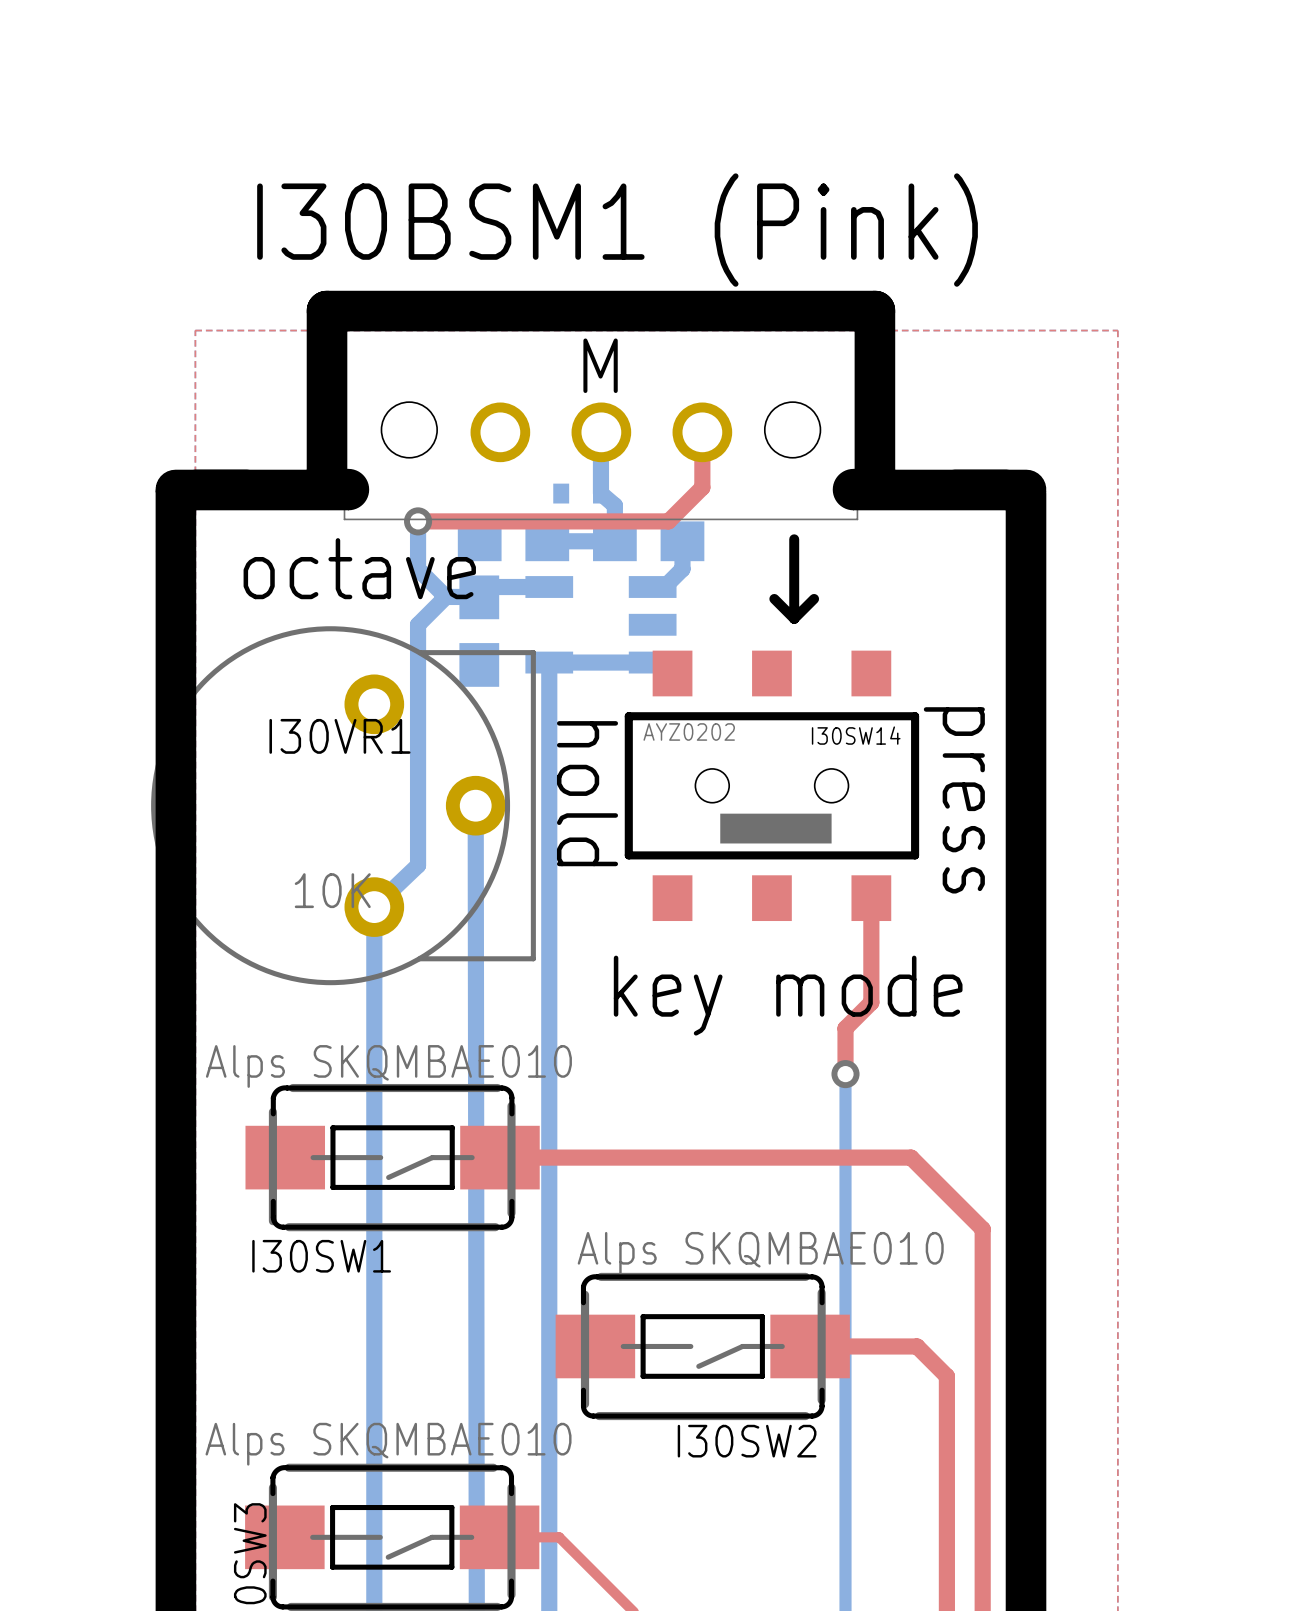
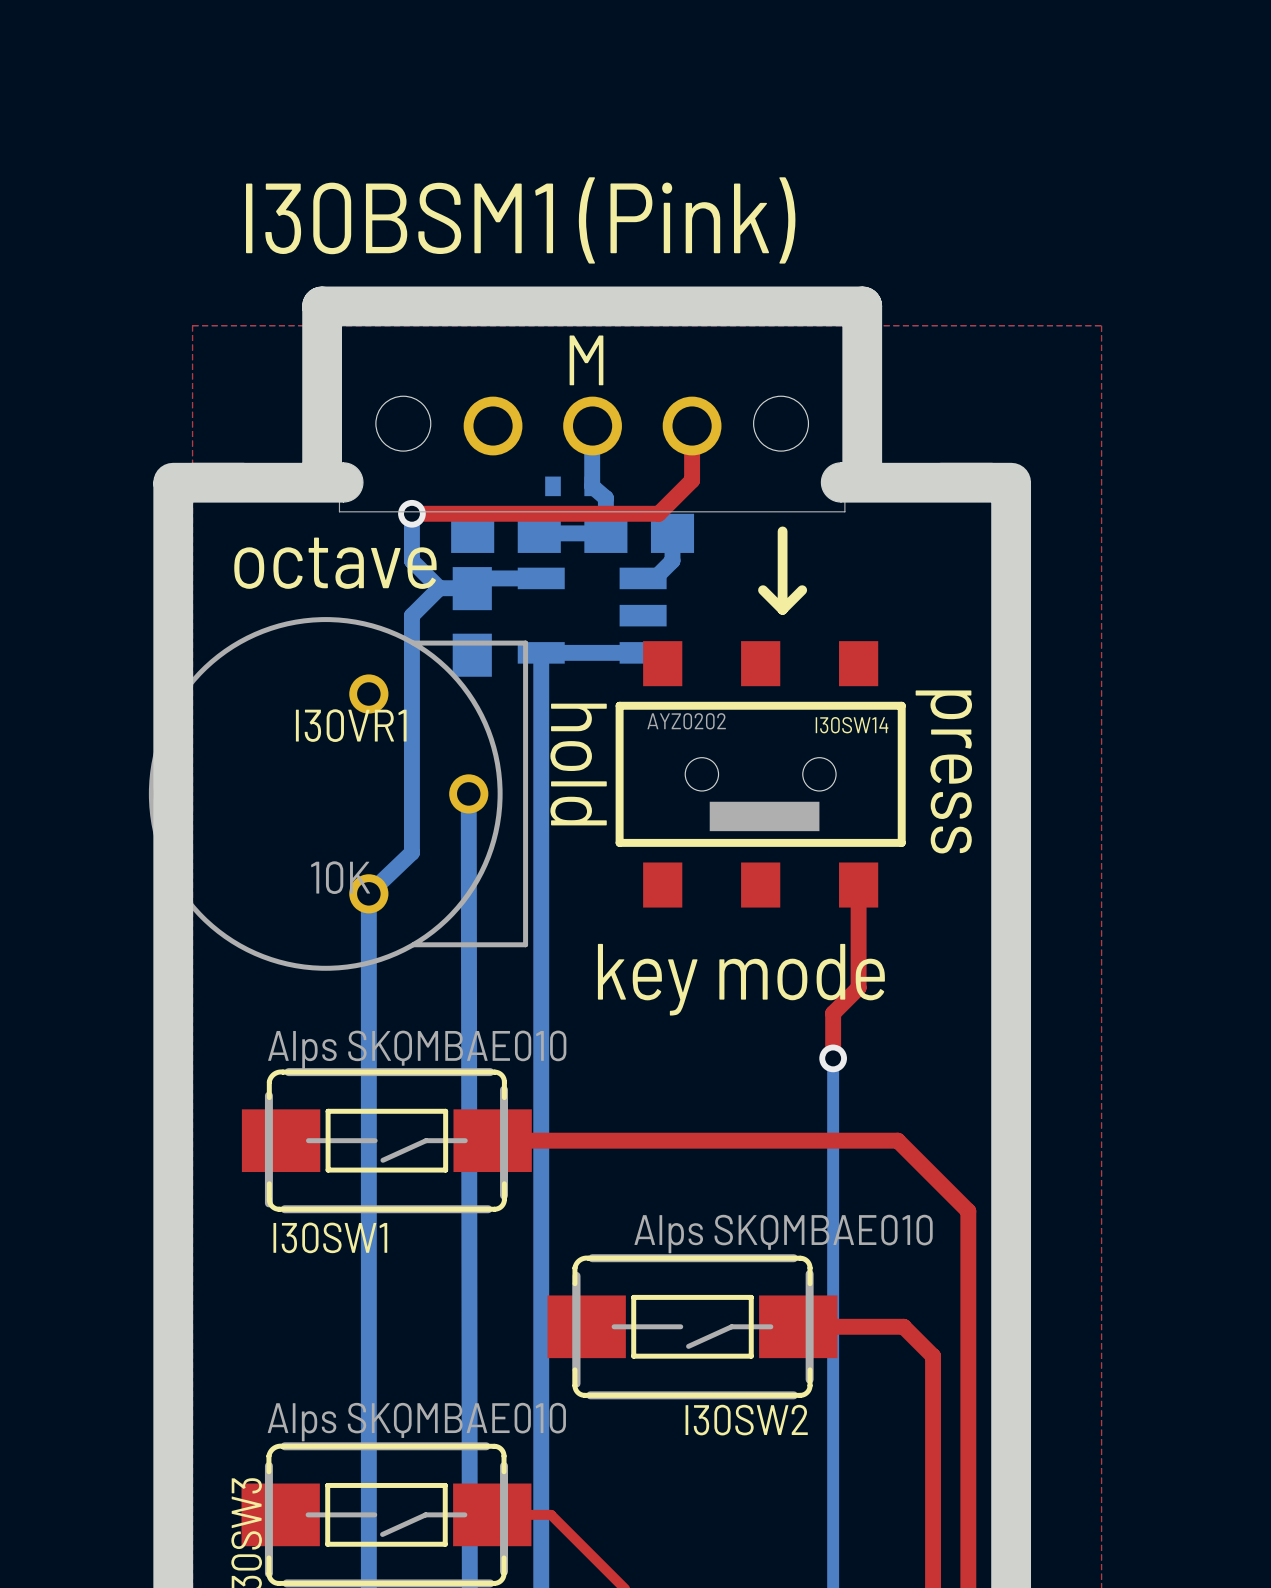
I30VR1 footprint: [151, 626, 536, 986] -> [148, 617, 529, 971]

